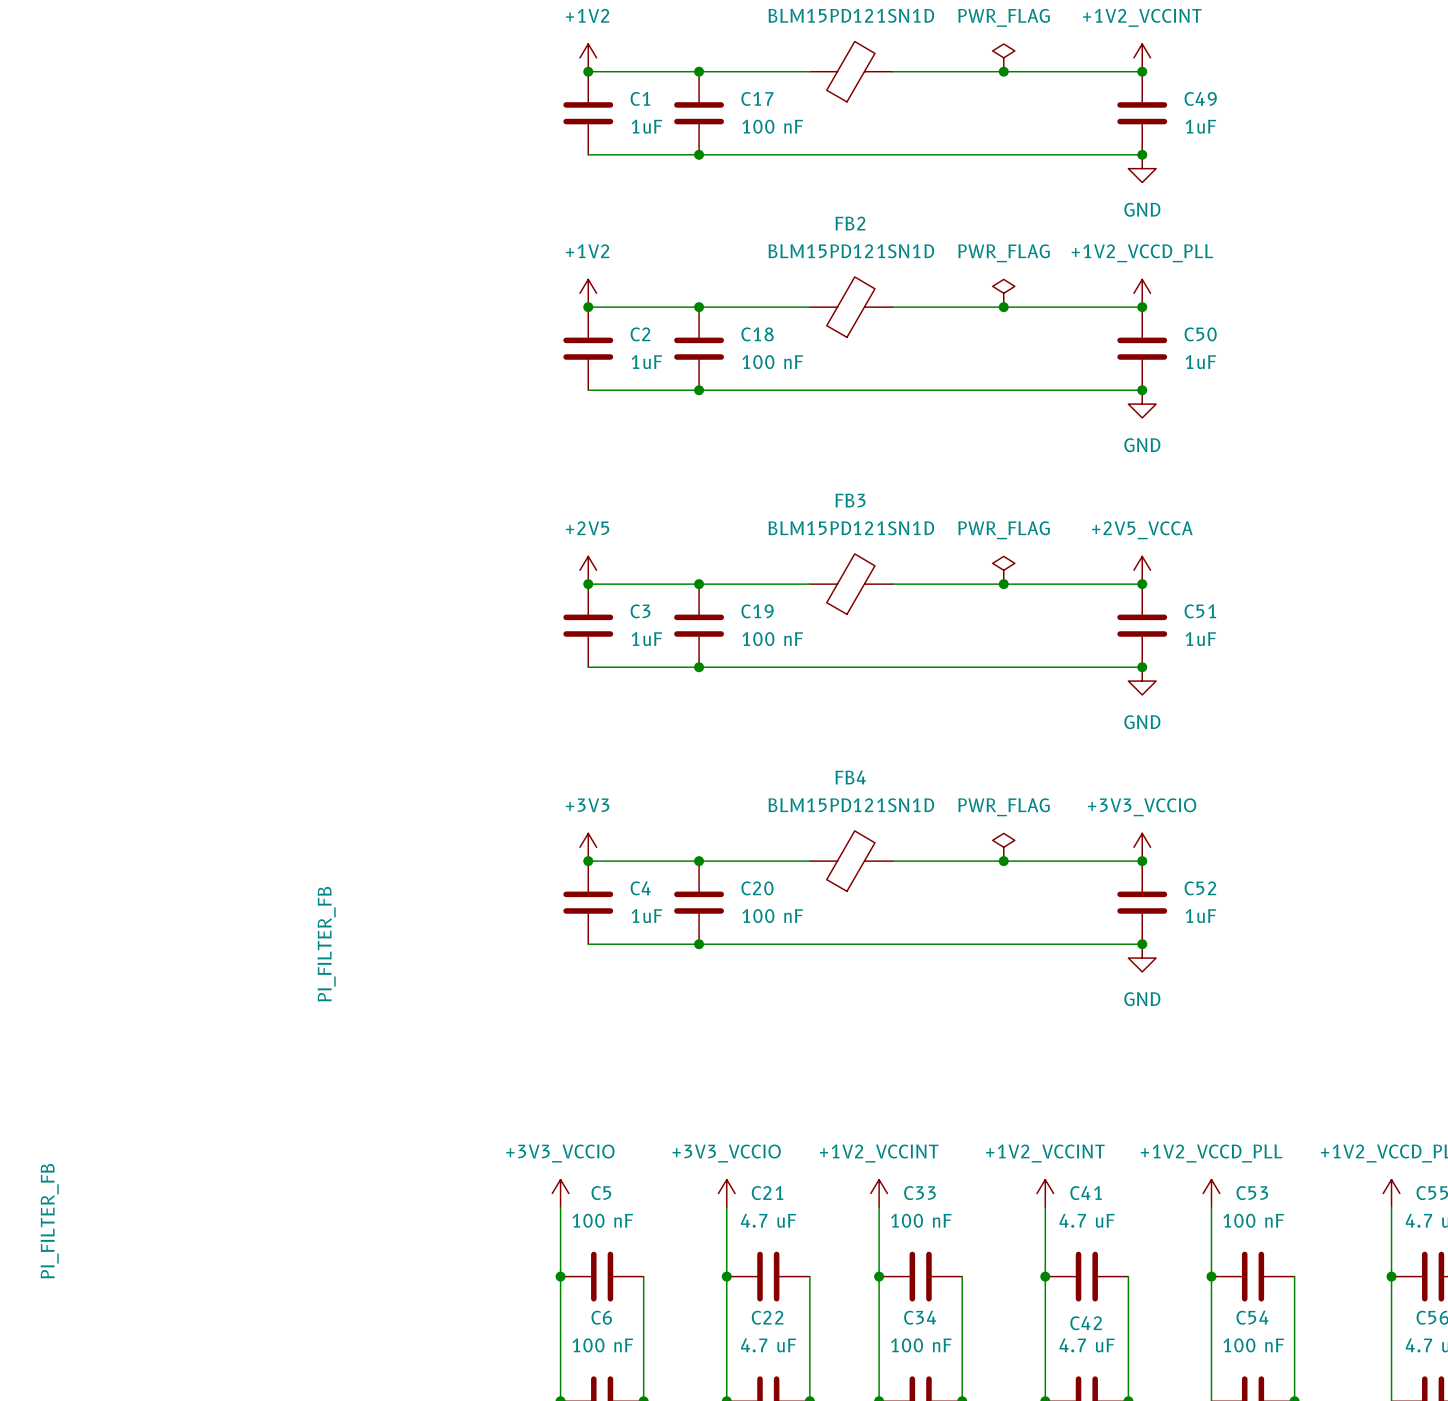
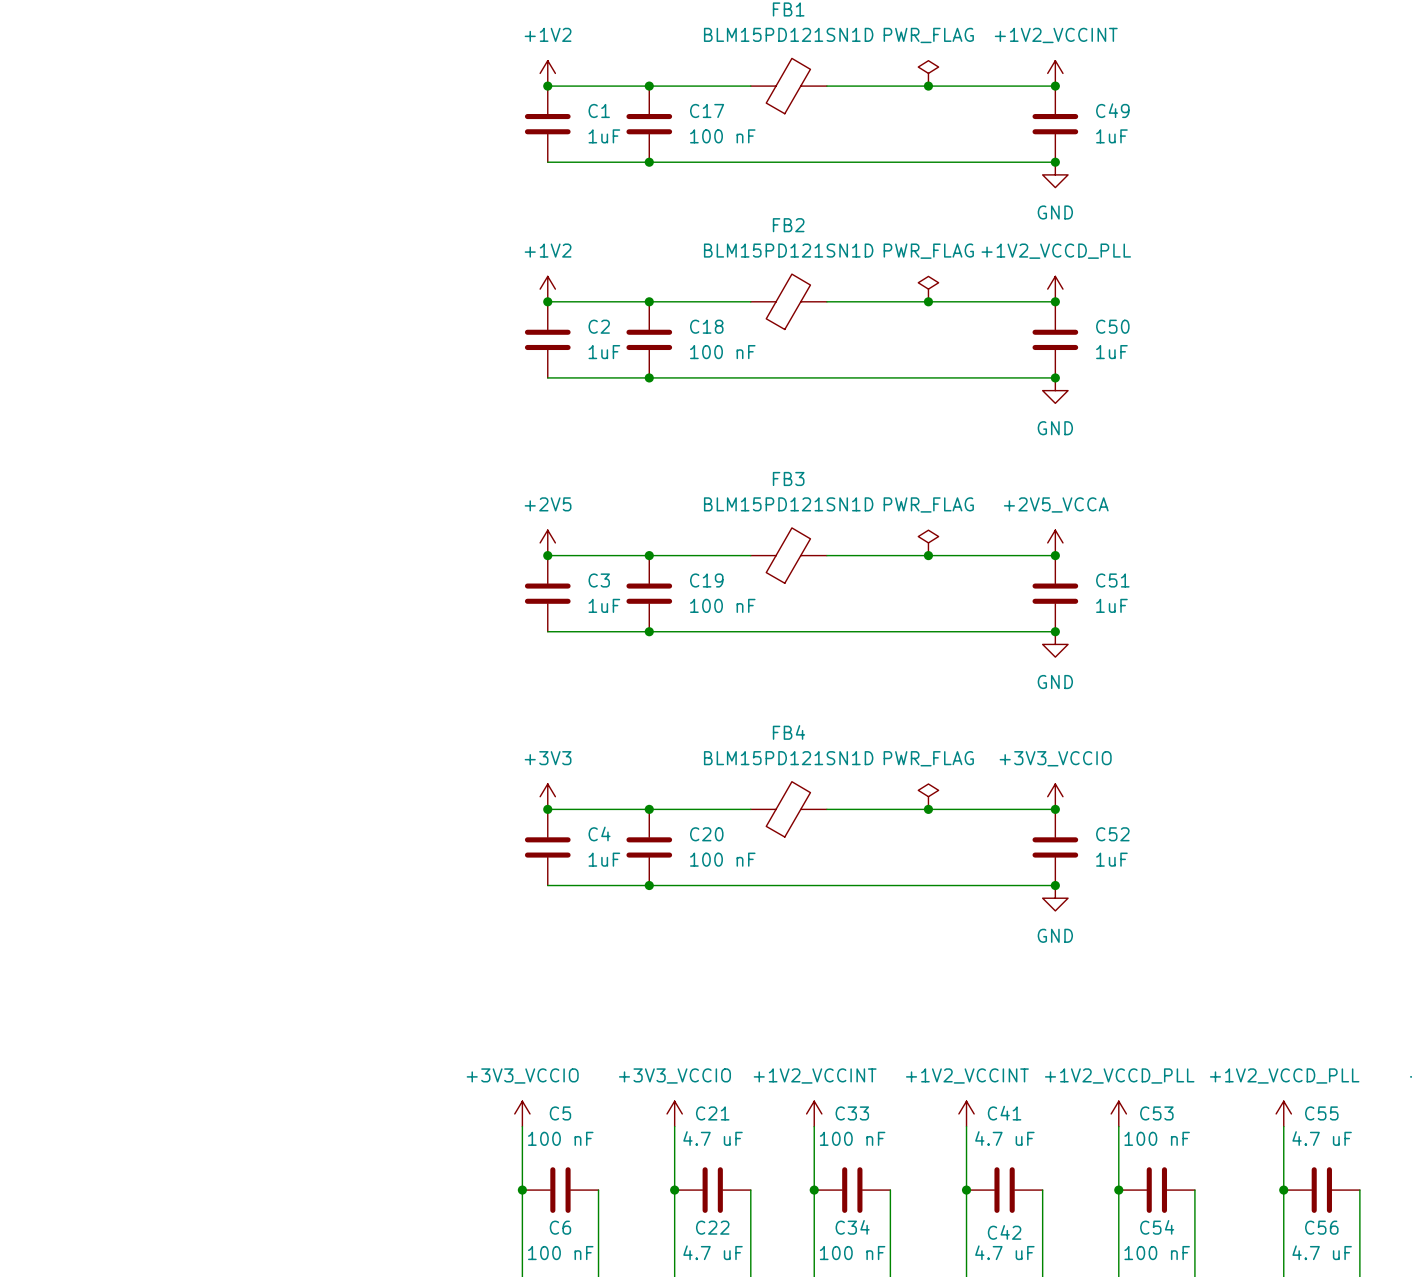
FB2 text: PI_FILTER_FB (326, 944) -> none
FB3 text: PI_FILTER_FB (49, 1221) -> none

